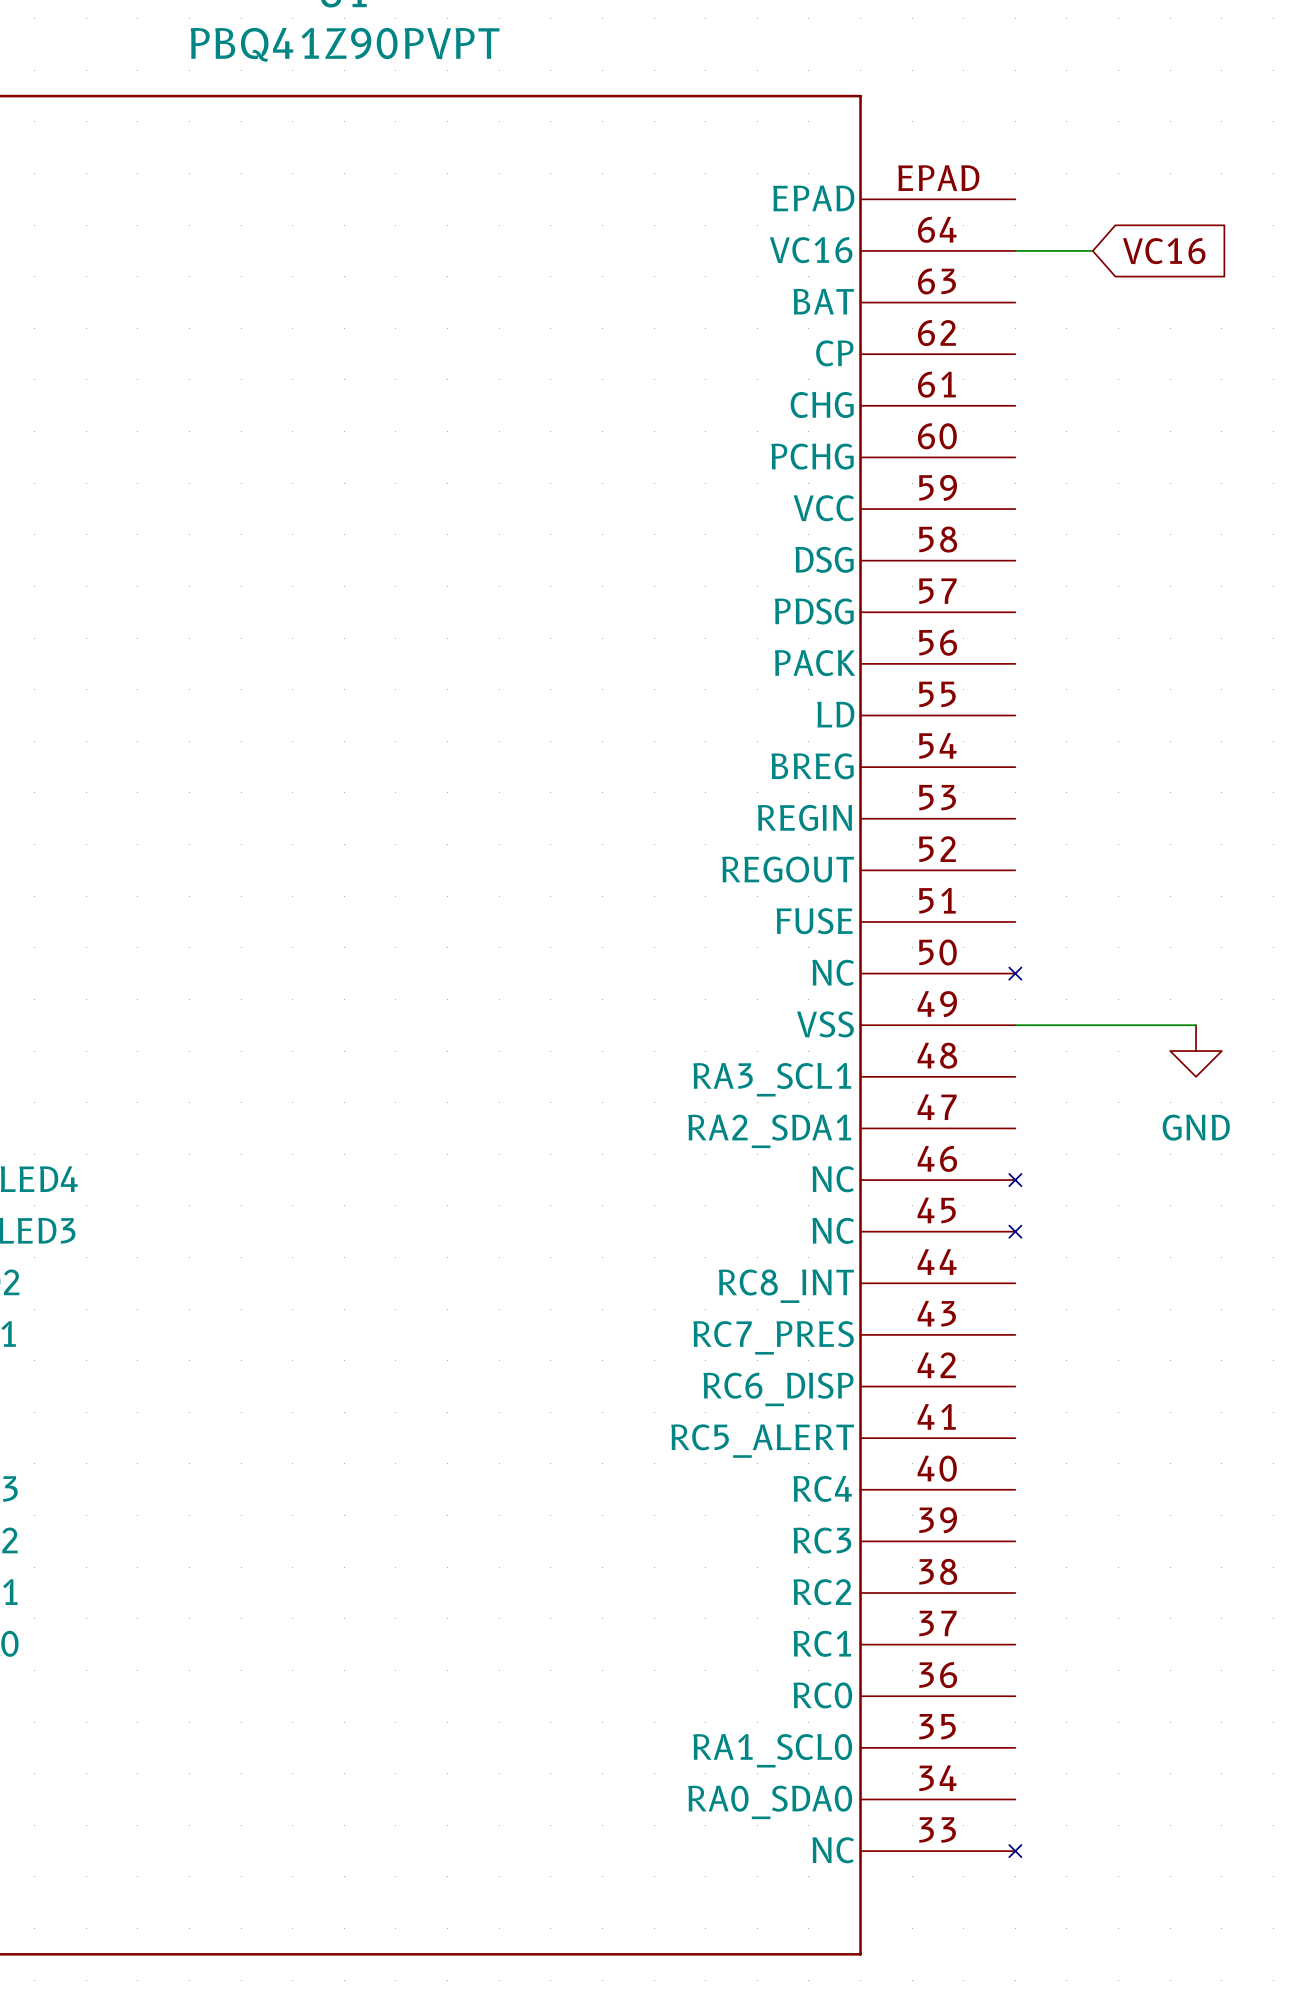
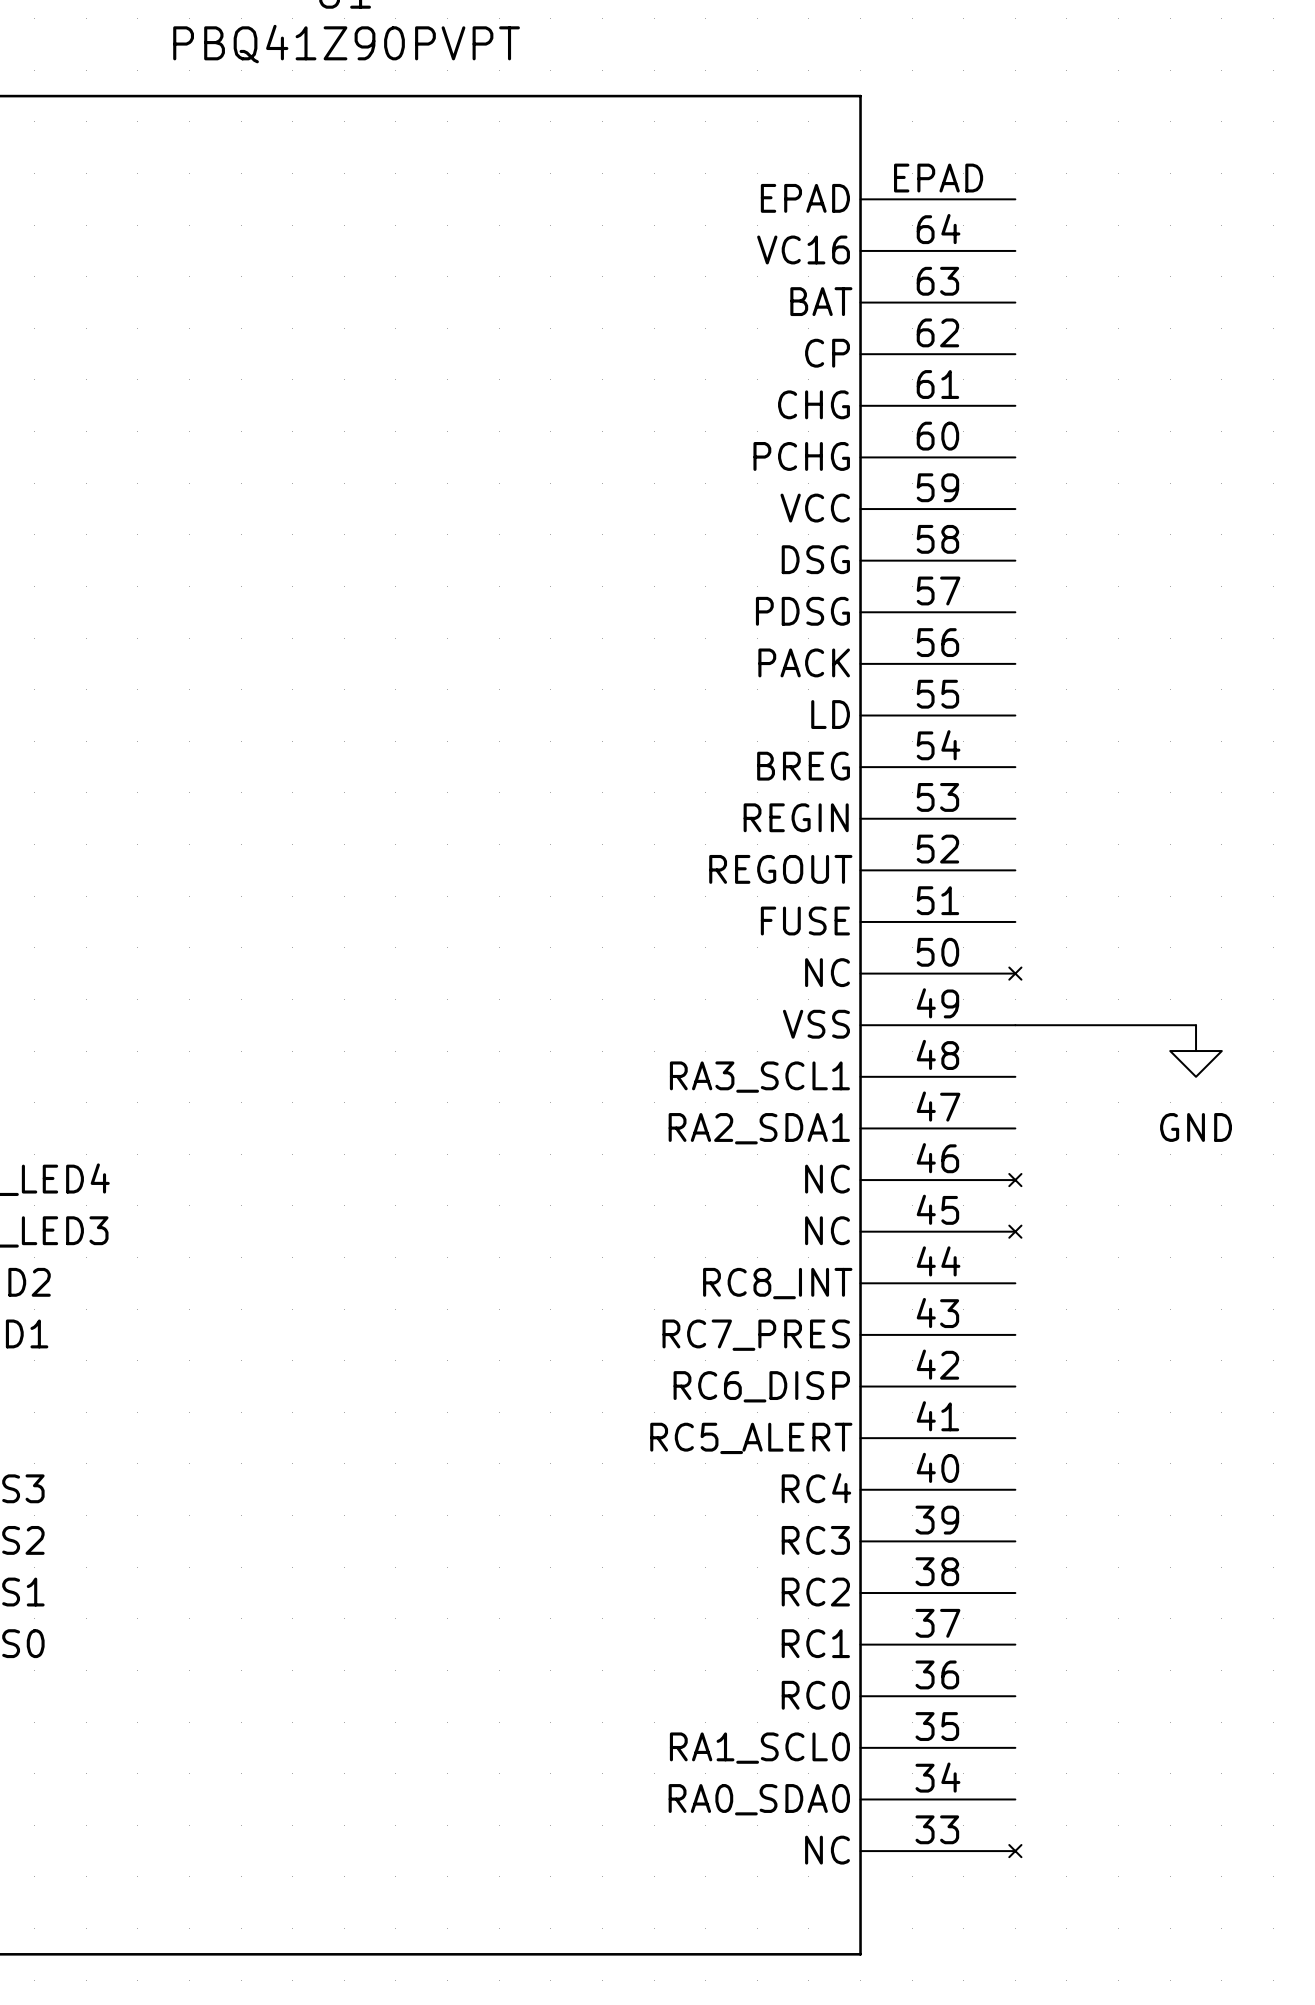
wire: (1015, 250) (1092, 250) -> none
global label: VC16 (1164, 251) -> none

